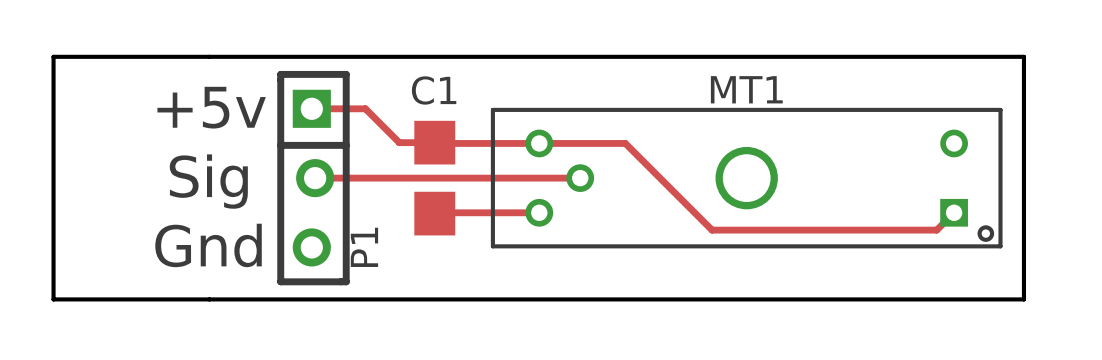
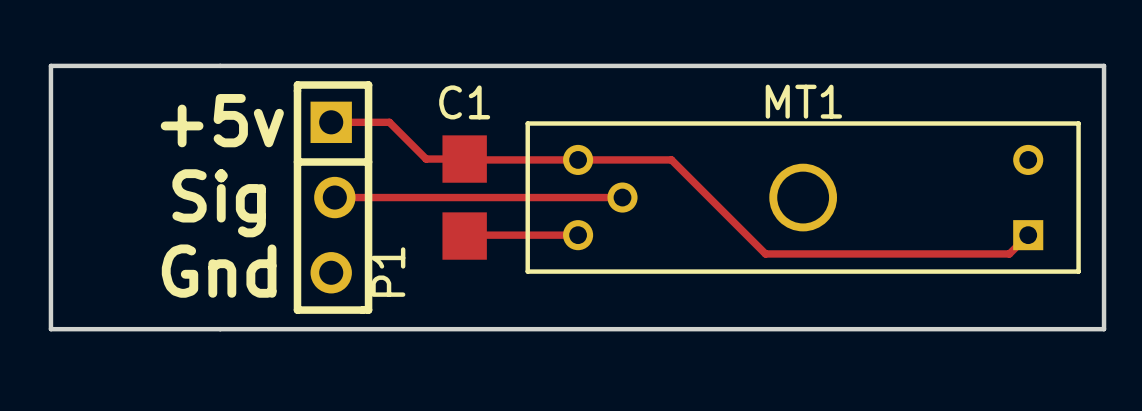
MT1 footprint: [490, 107, 1003, 249] -> [525, 121, 1081, 274]

